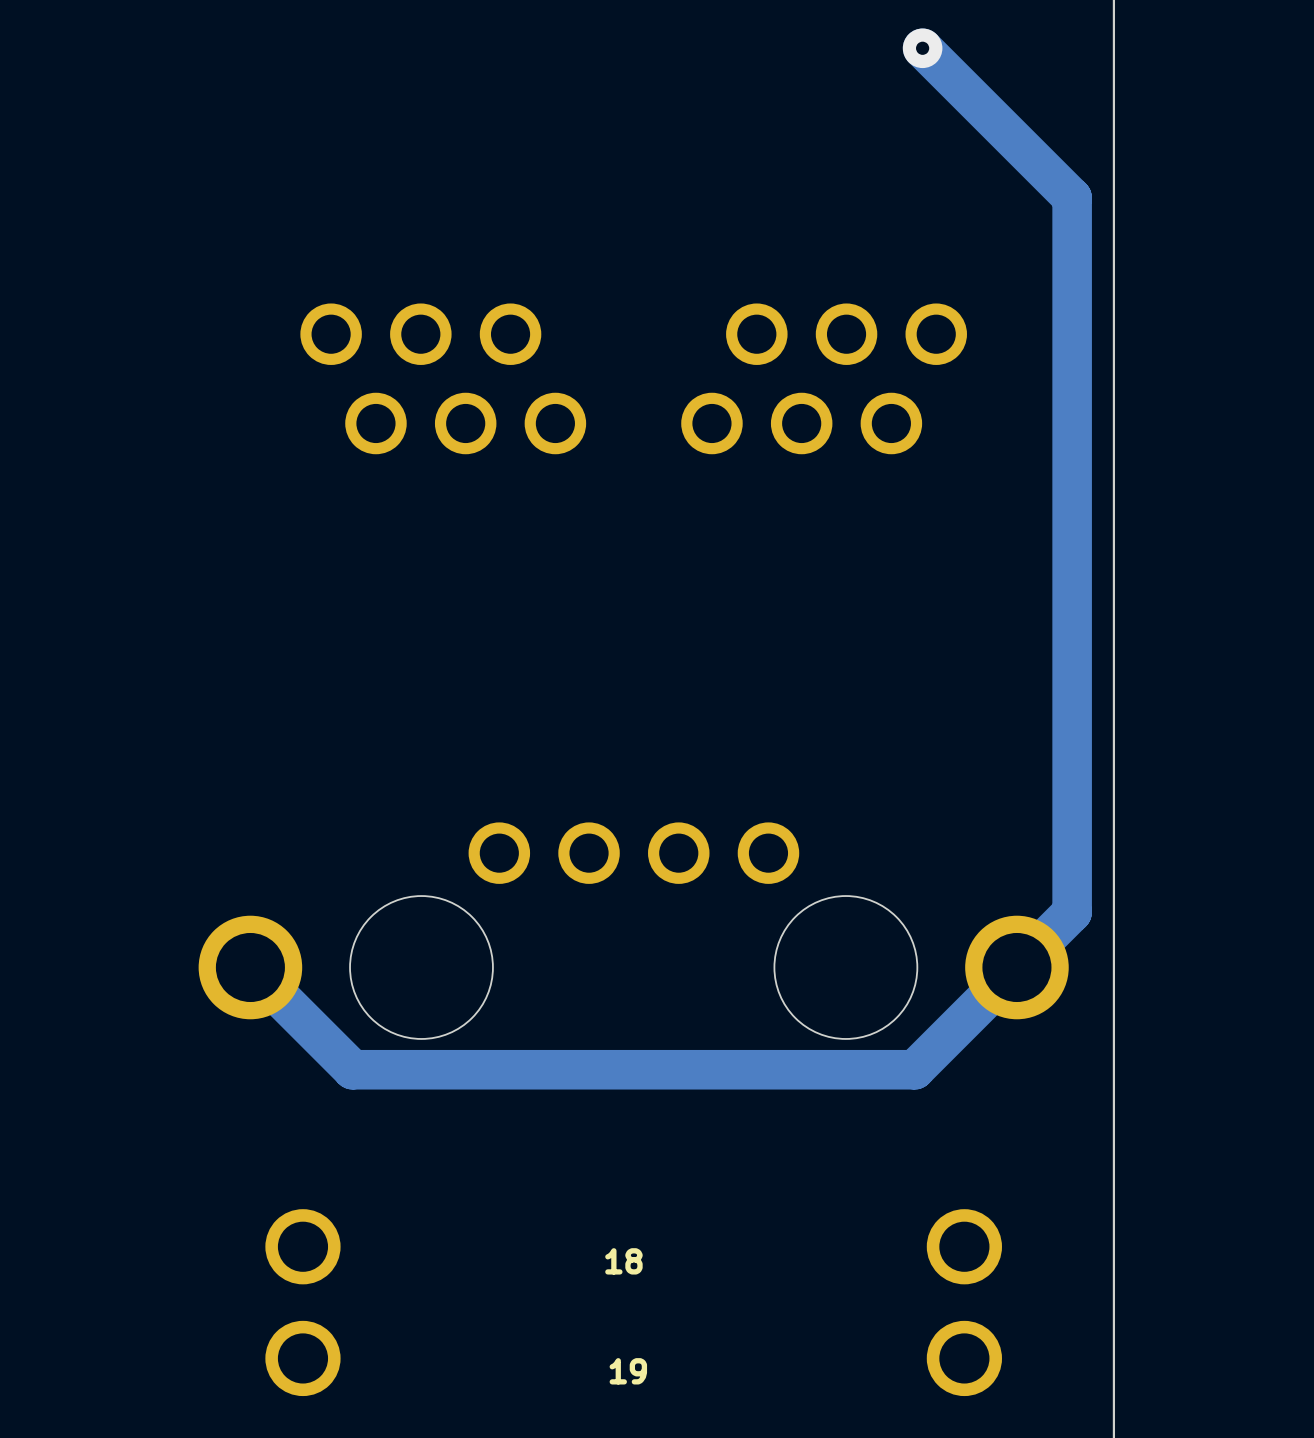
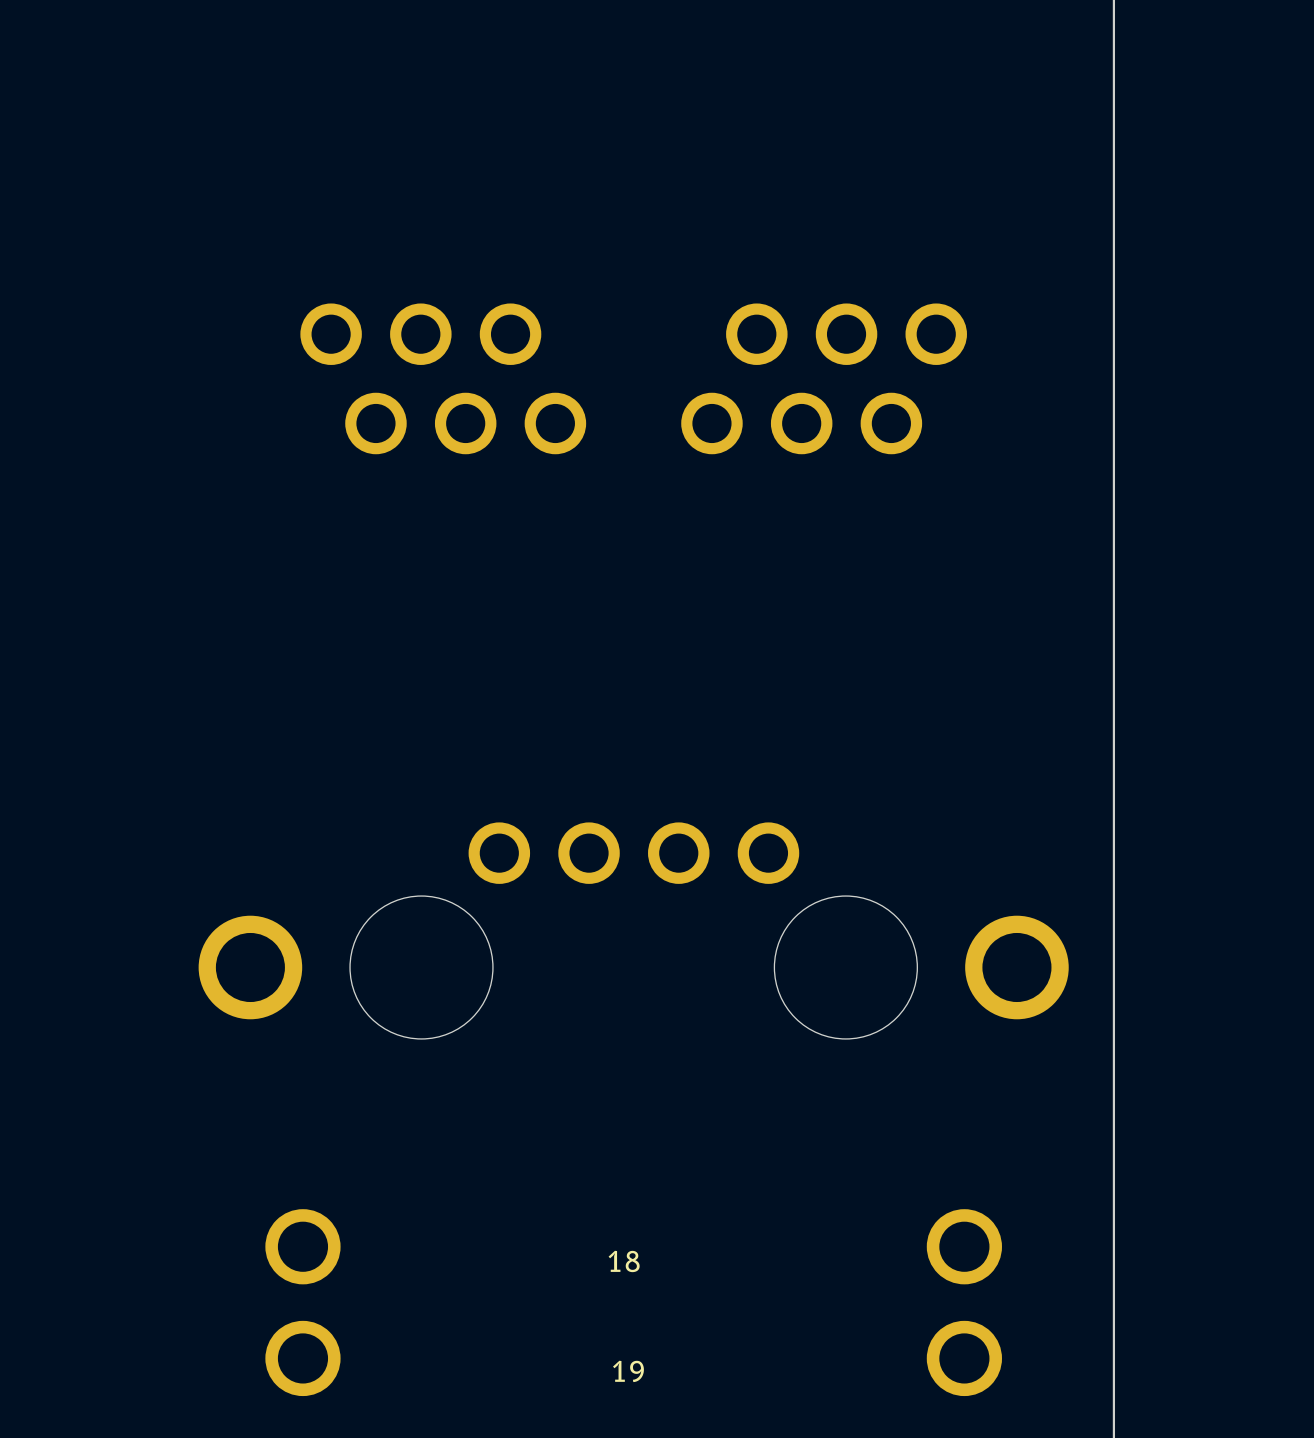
track: (922, 48) (1072, 197) (1072, 912) (914, 1069) (352, 1069) (250, 967) -> none
via: (922, 48) -> none

